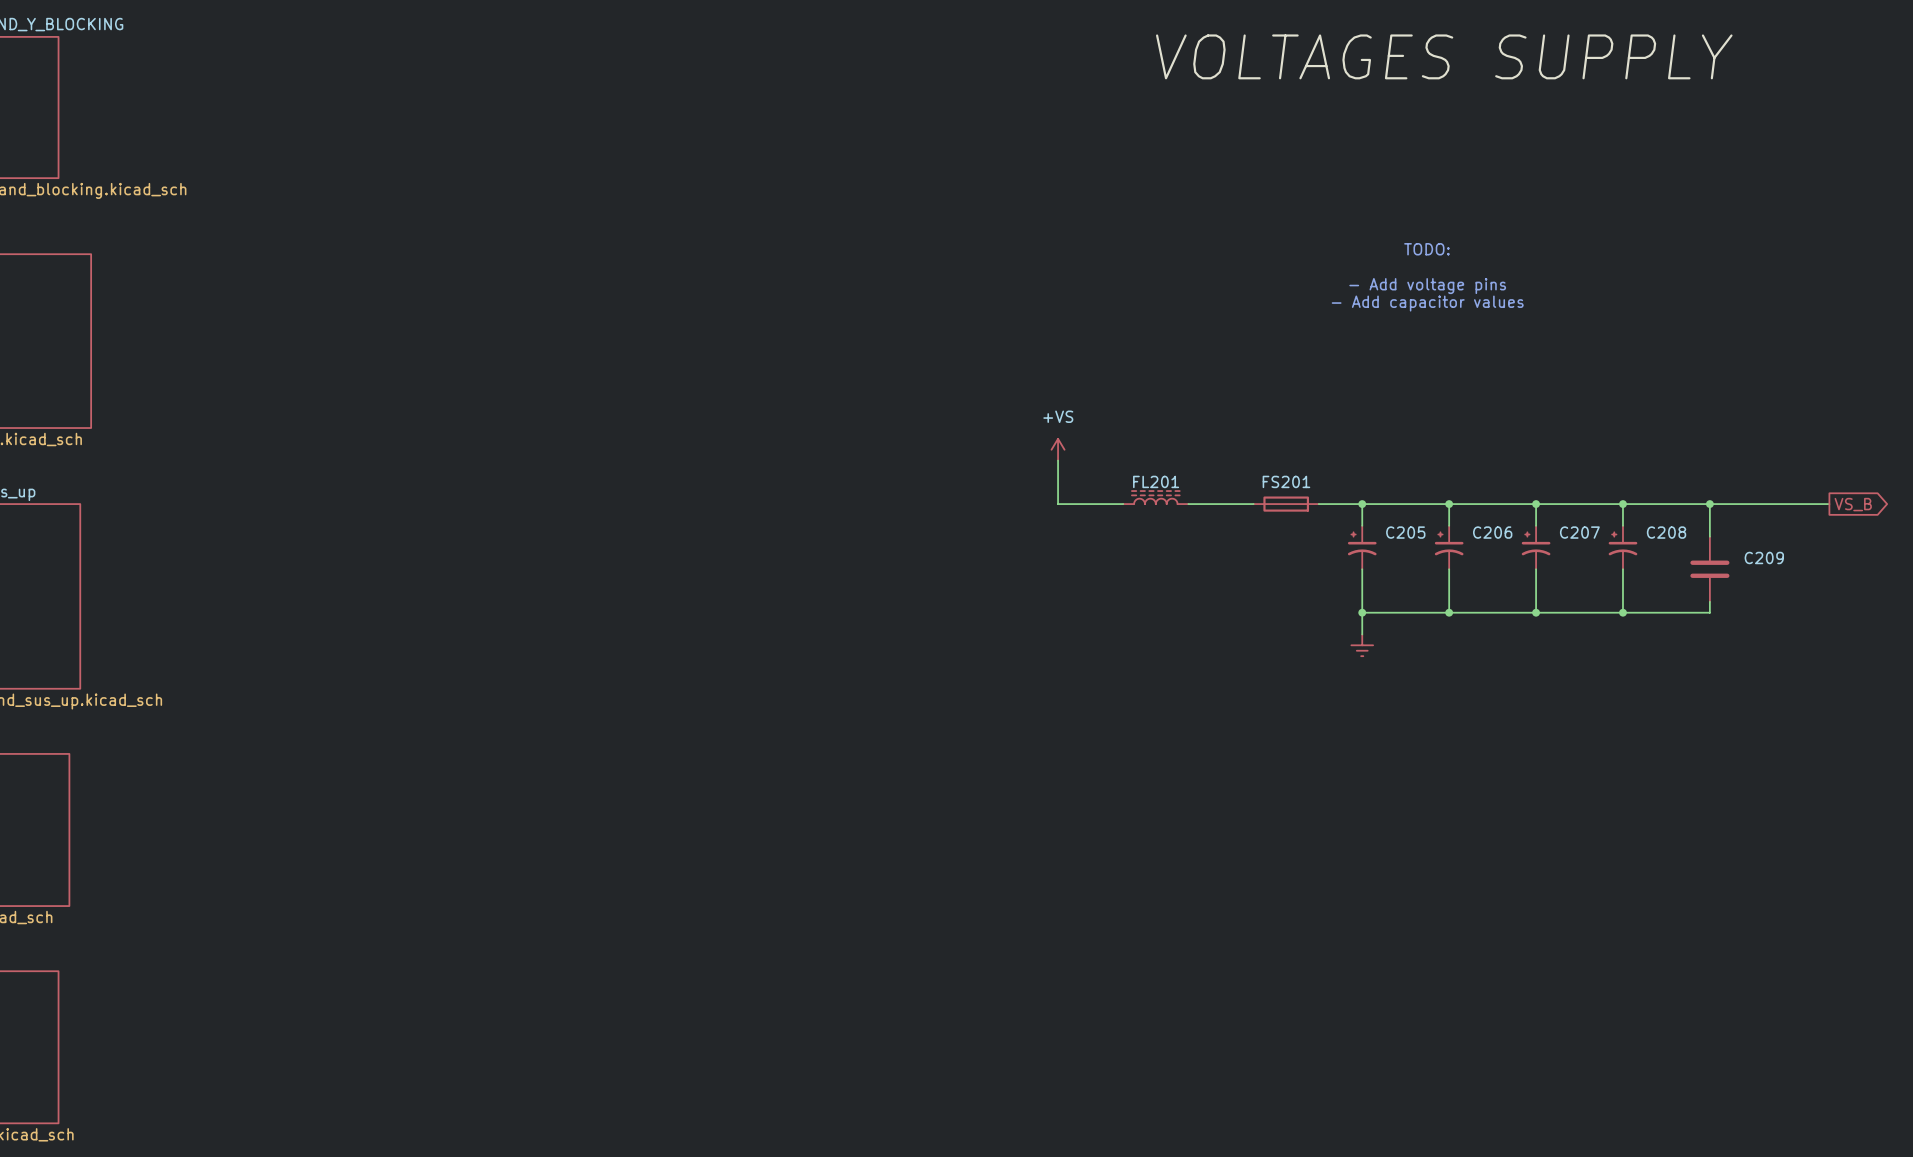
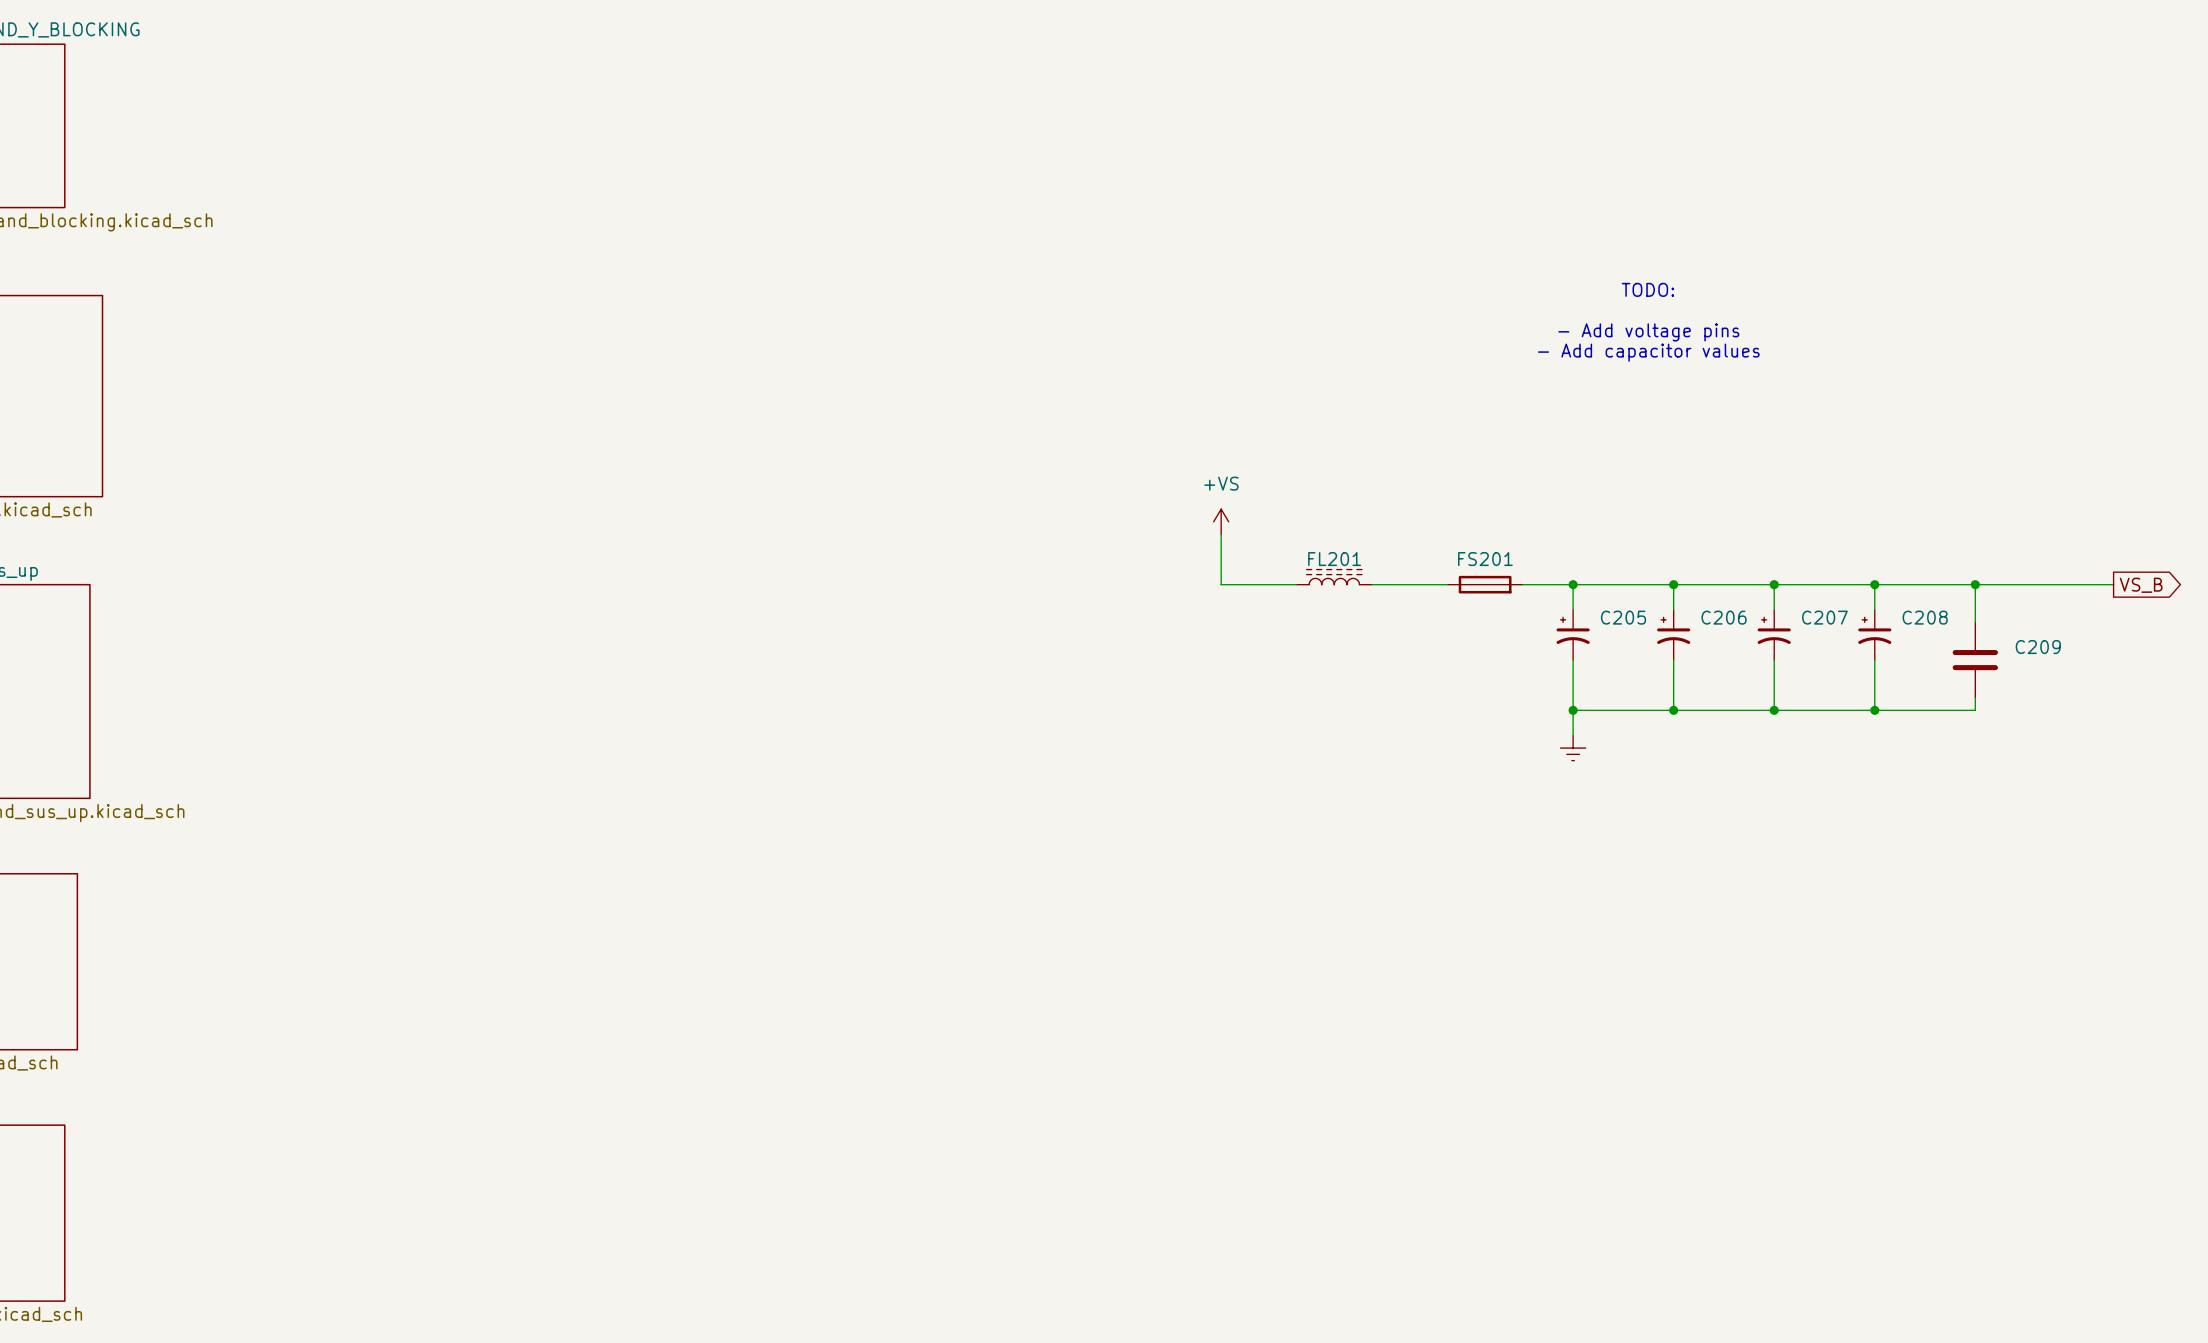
label: VOLTAGES SUPPLY (1444, 56) -> none

